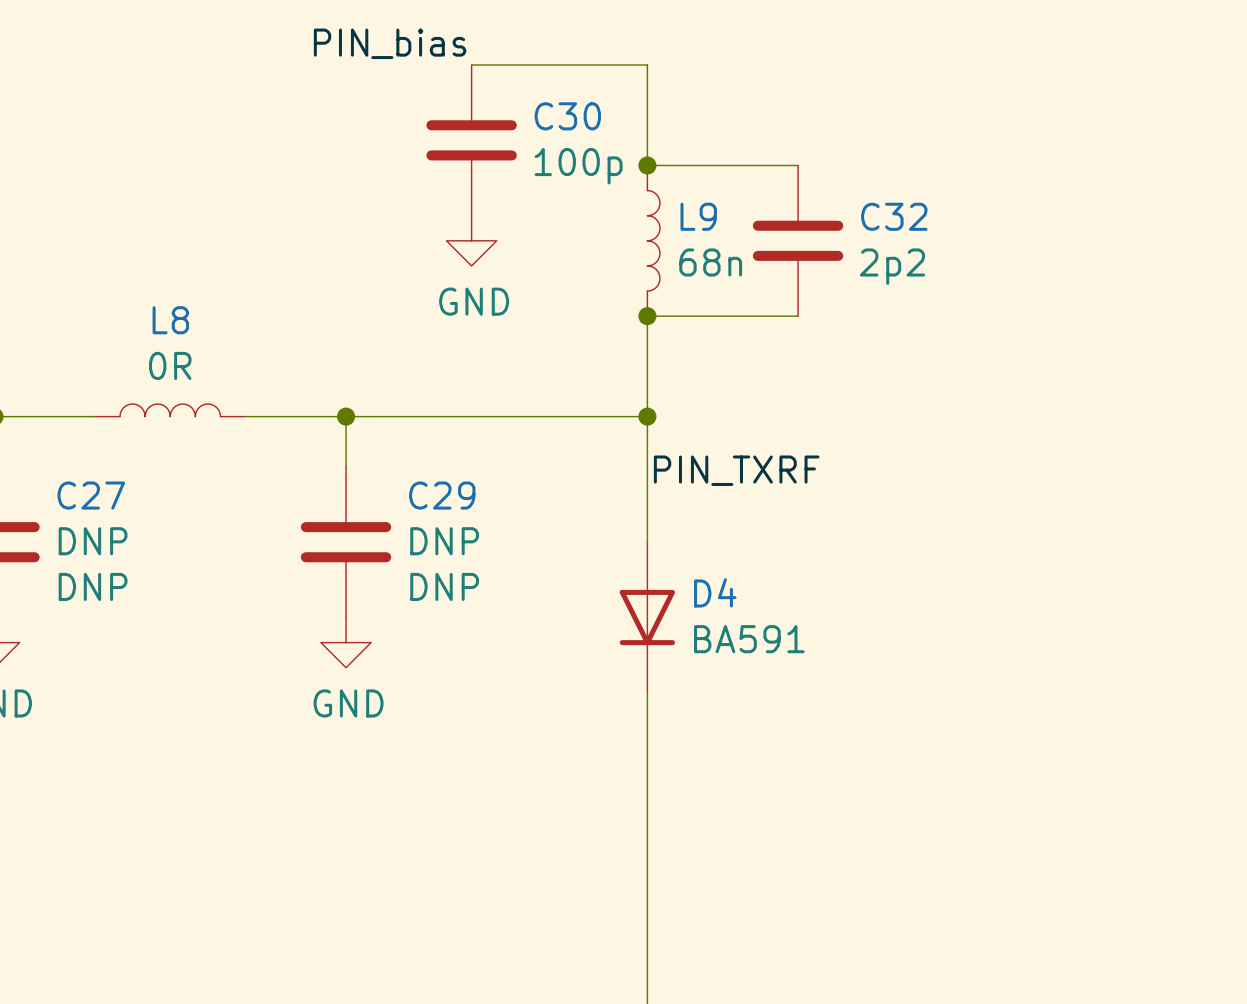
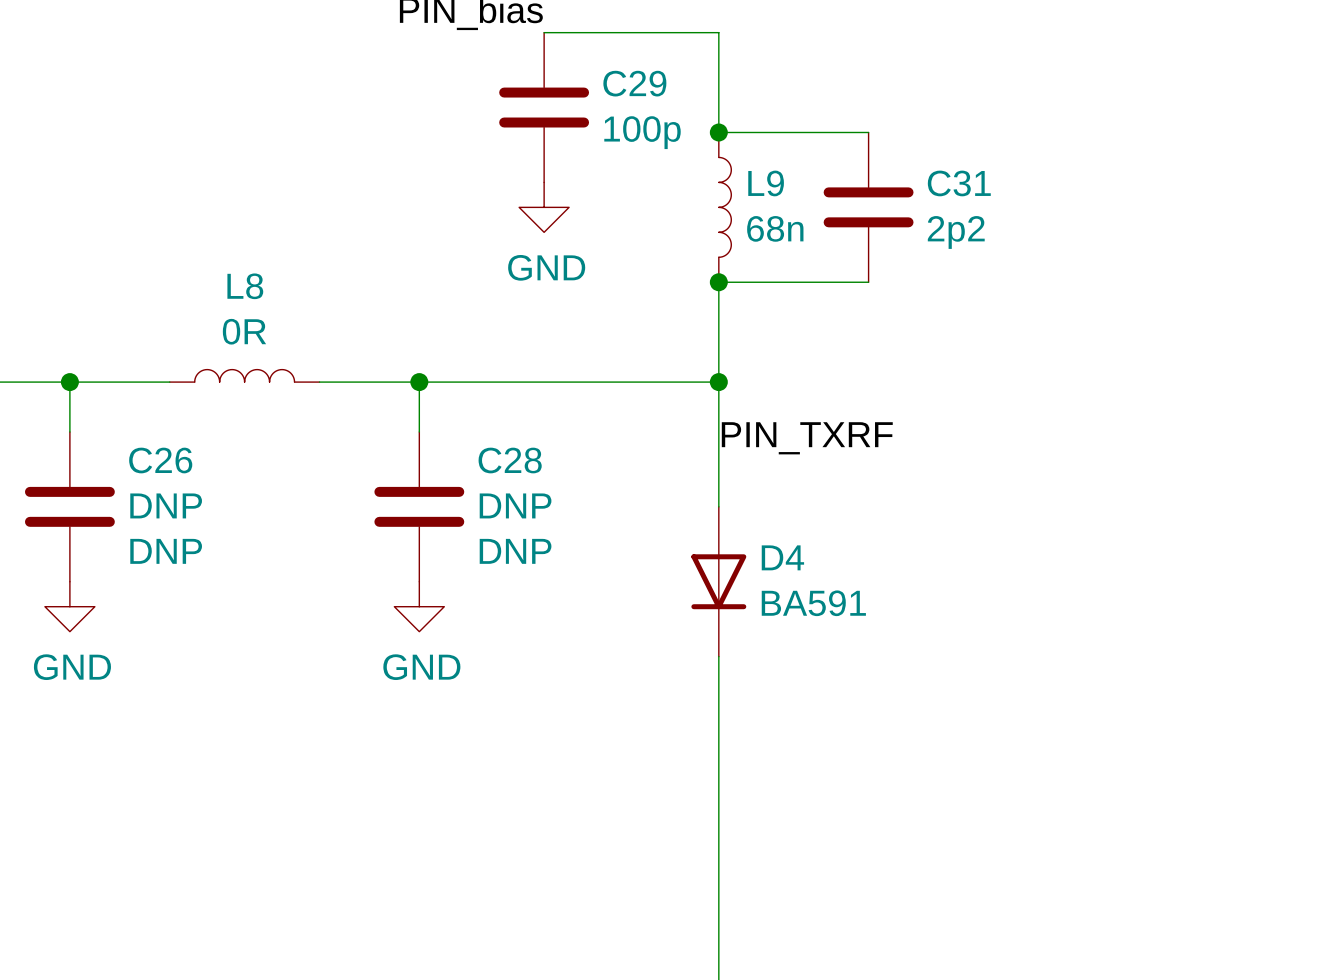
C30 name: C30 (567, 116) -> C29 (634, 83)
C32 name: C32 (894, 216) -> C31 (959, 183)
C27 name: C27 (91, 495) -> C26 (160, 460)
C29 name: C29 (442, 495) -> C28 (510, 460)

